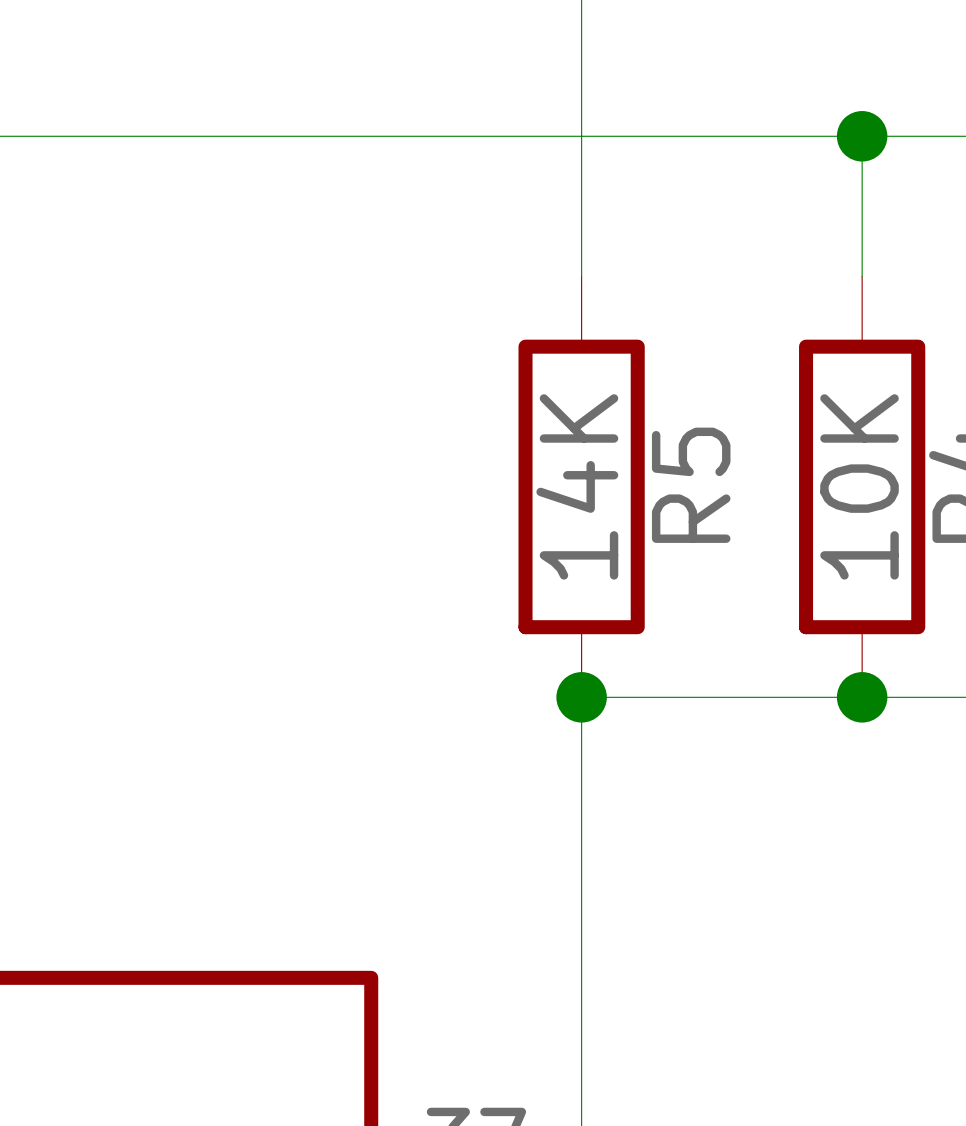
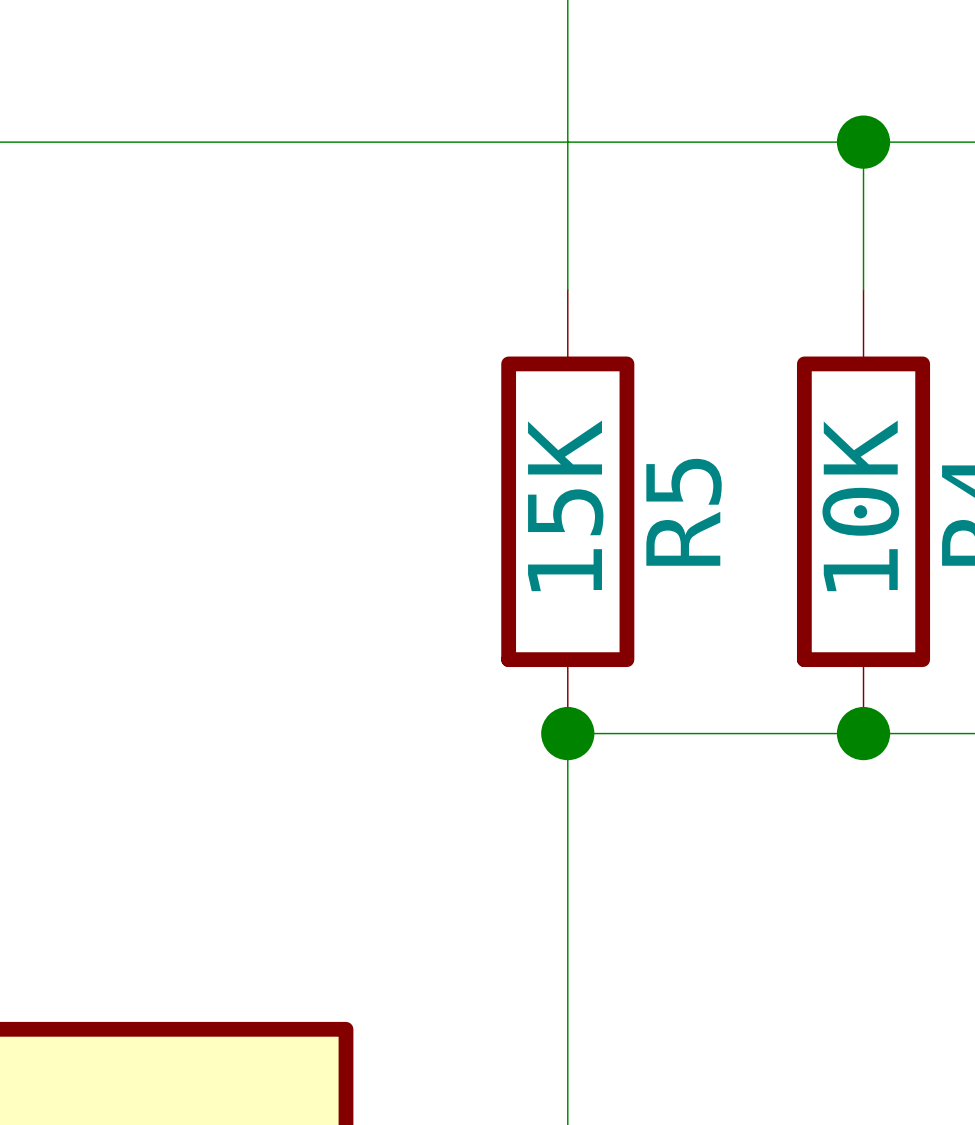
R5 value: 14K (577, 486) -> 15K (565, 505)

